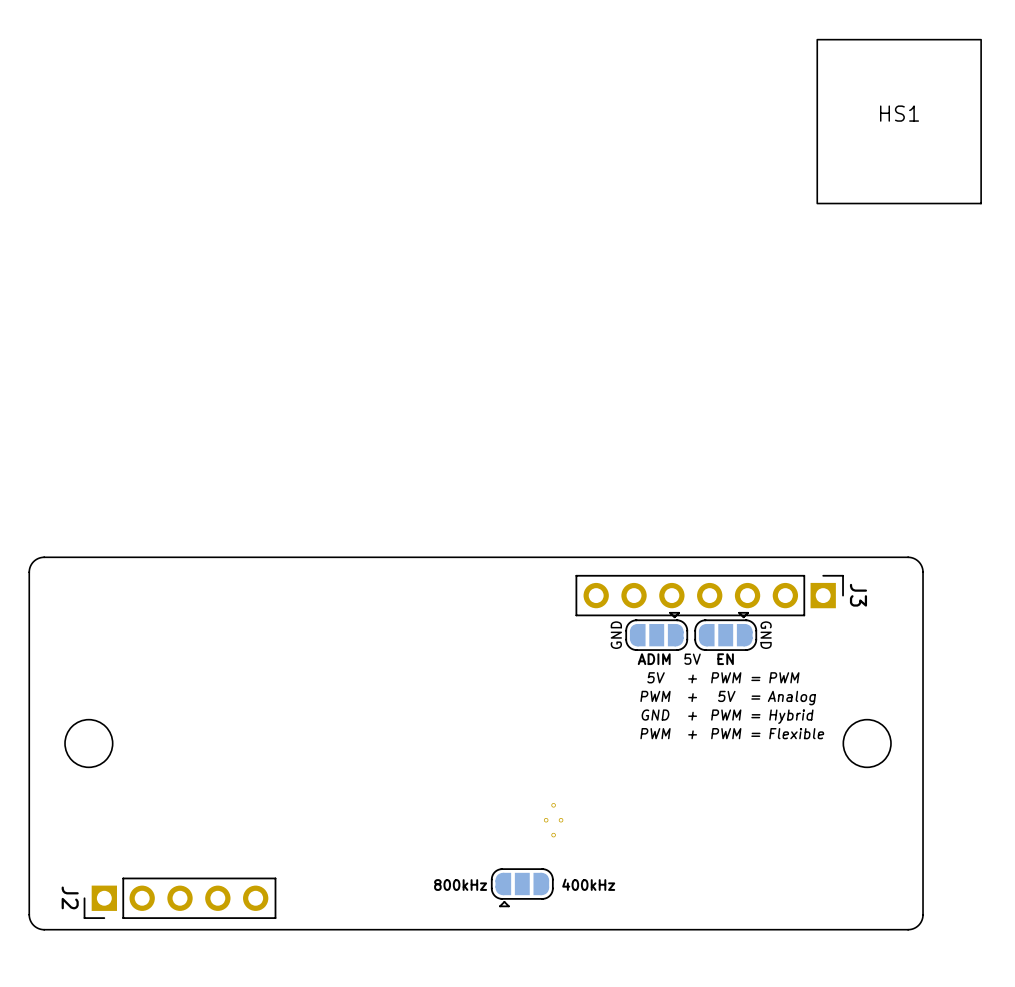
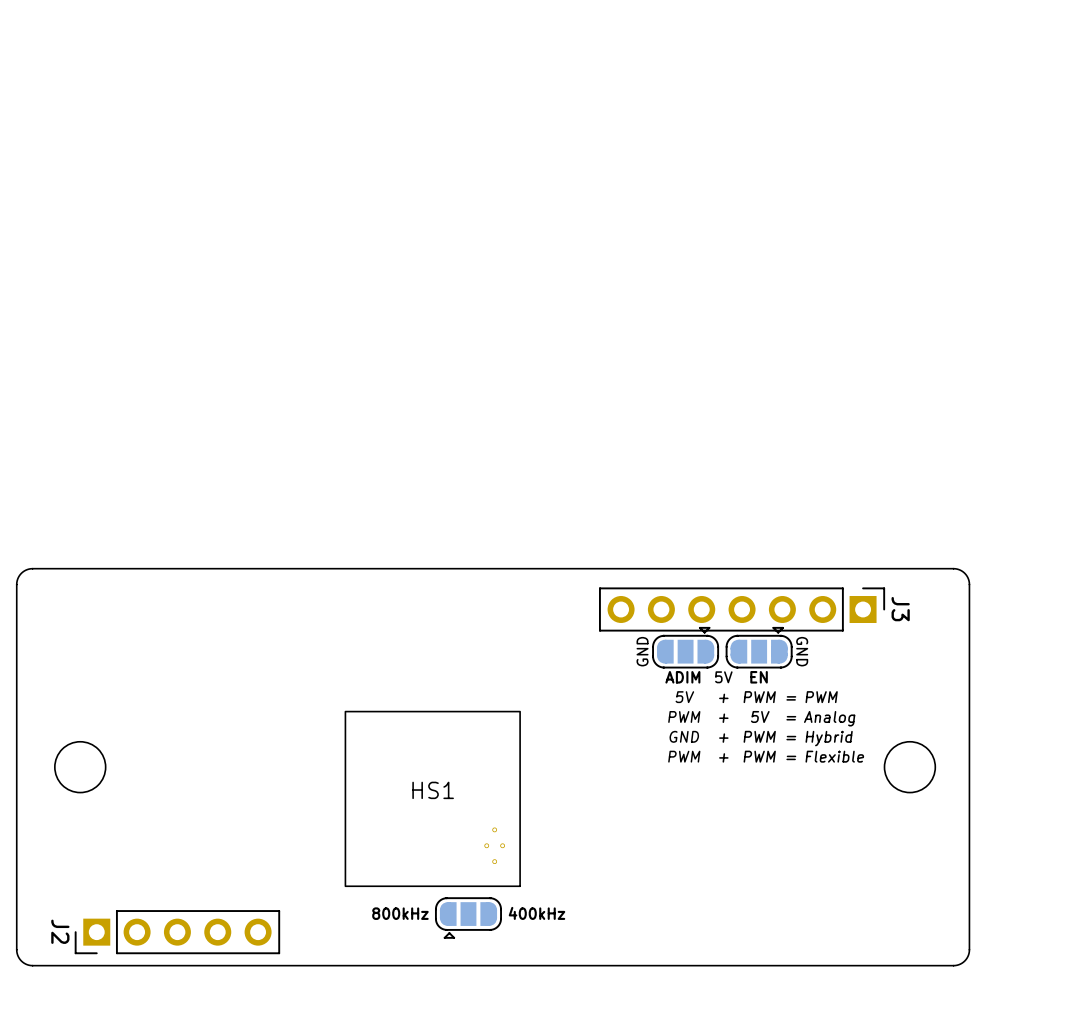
HS1 position: (899, 121) -> (432, 798)
part position: (553, 820) -> (494, 845)
text position: 400kHz (588, 884) -> 400kHz (537, 913)
text position: 800kHz (460, 885) -> 800kHz (400, 913)
part position: (522, 887) -> (468, 918)

